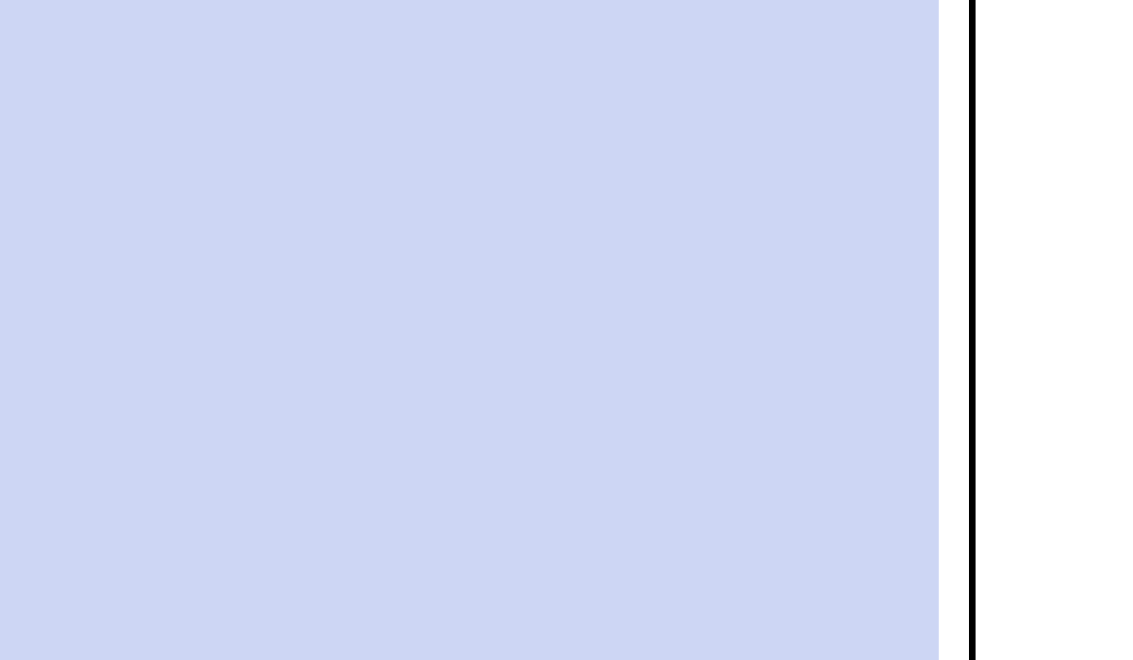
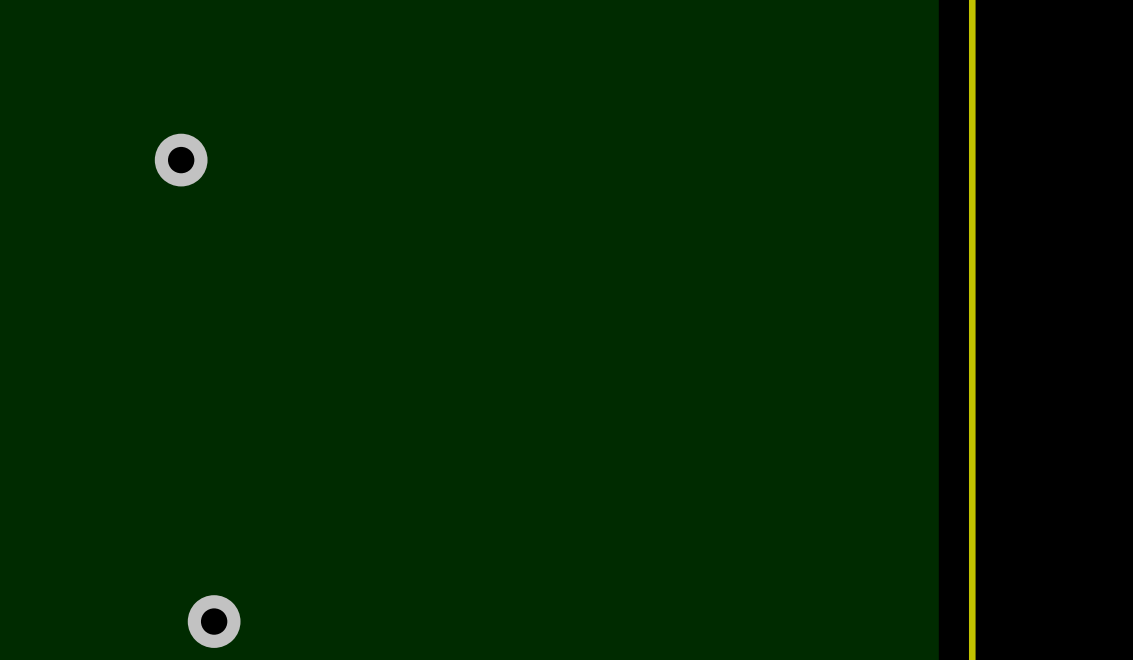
via: none -> (181, 160)
via: none -> (214, 621)

